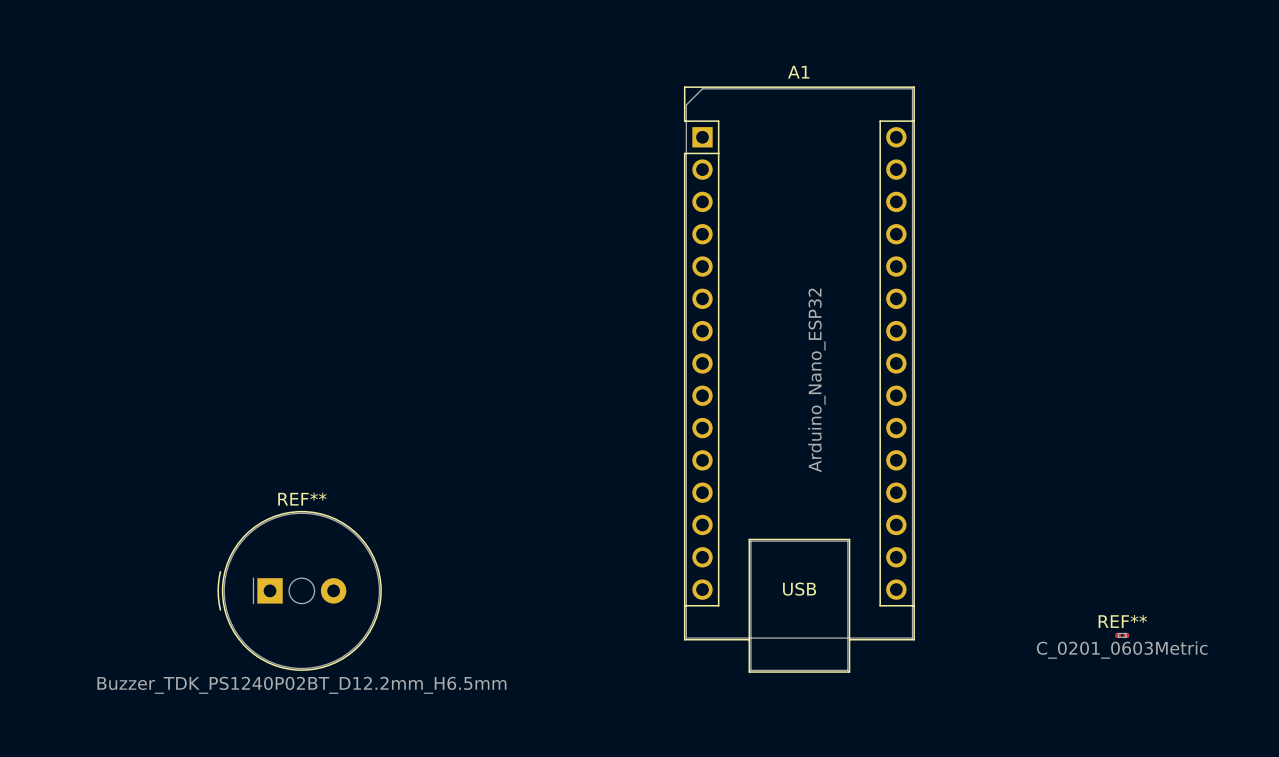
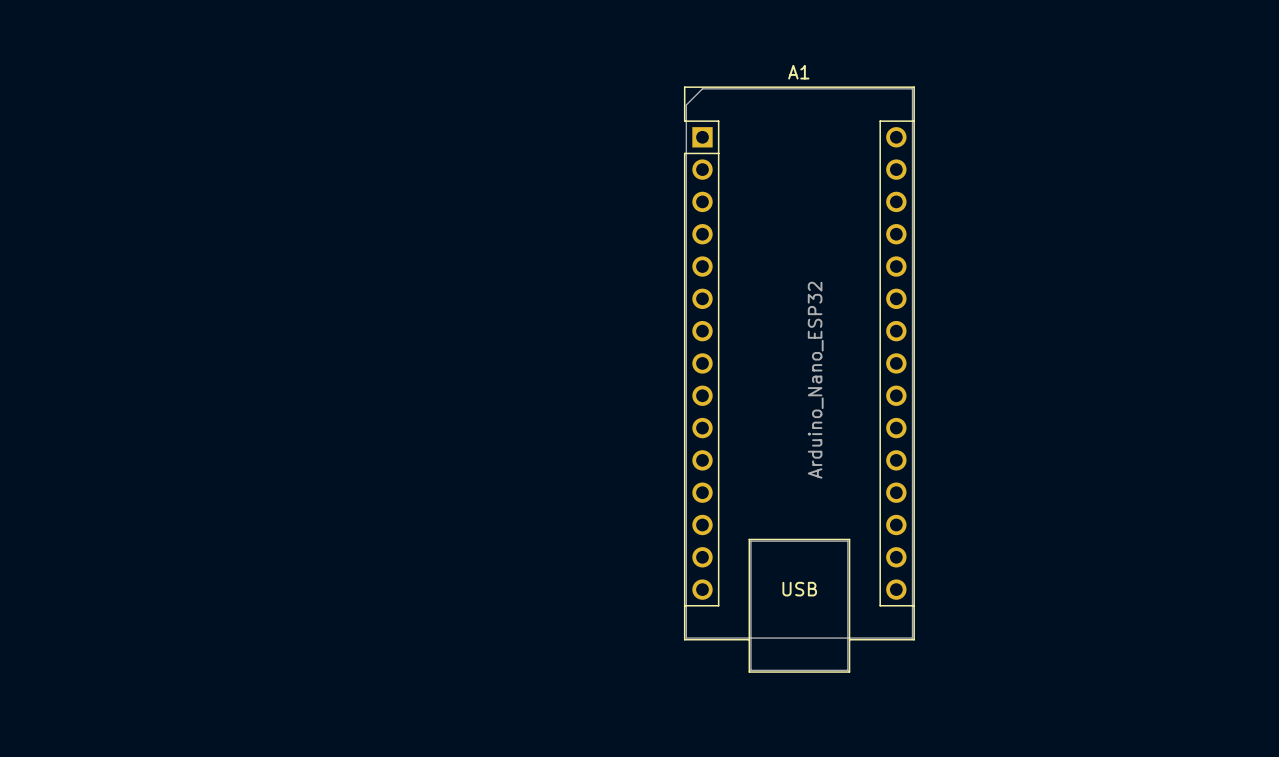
REF**: Buzzer_TDK_PS1240P02BT_D12.2mm_H6.5mm (299, 590) -> none
REF**: C_0201_0603Metric (1122, 635) -> none

